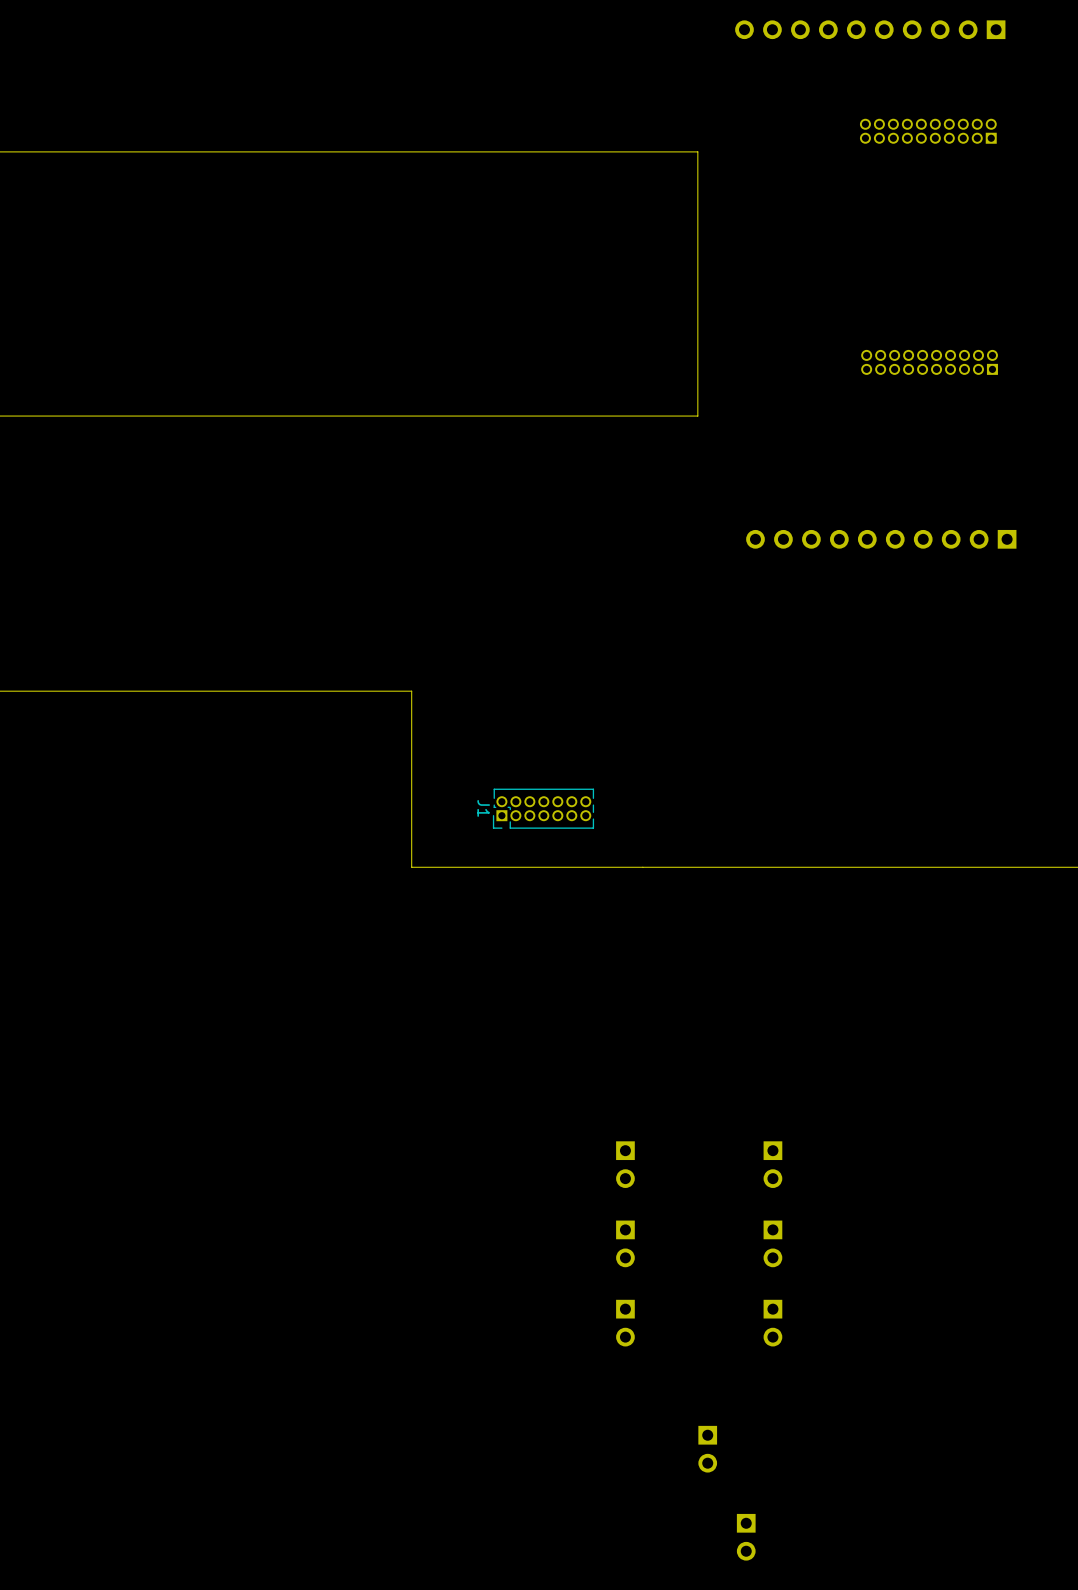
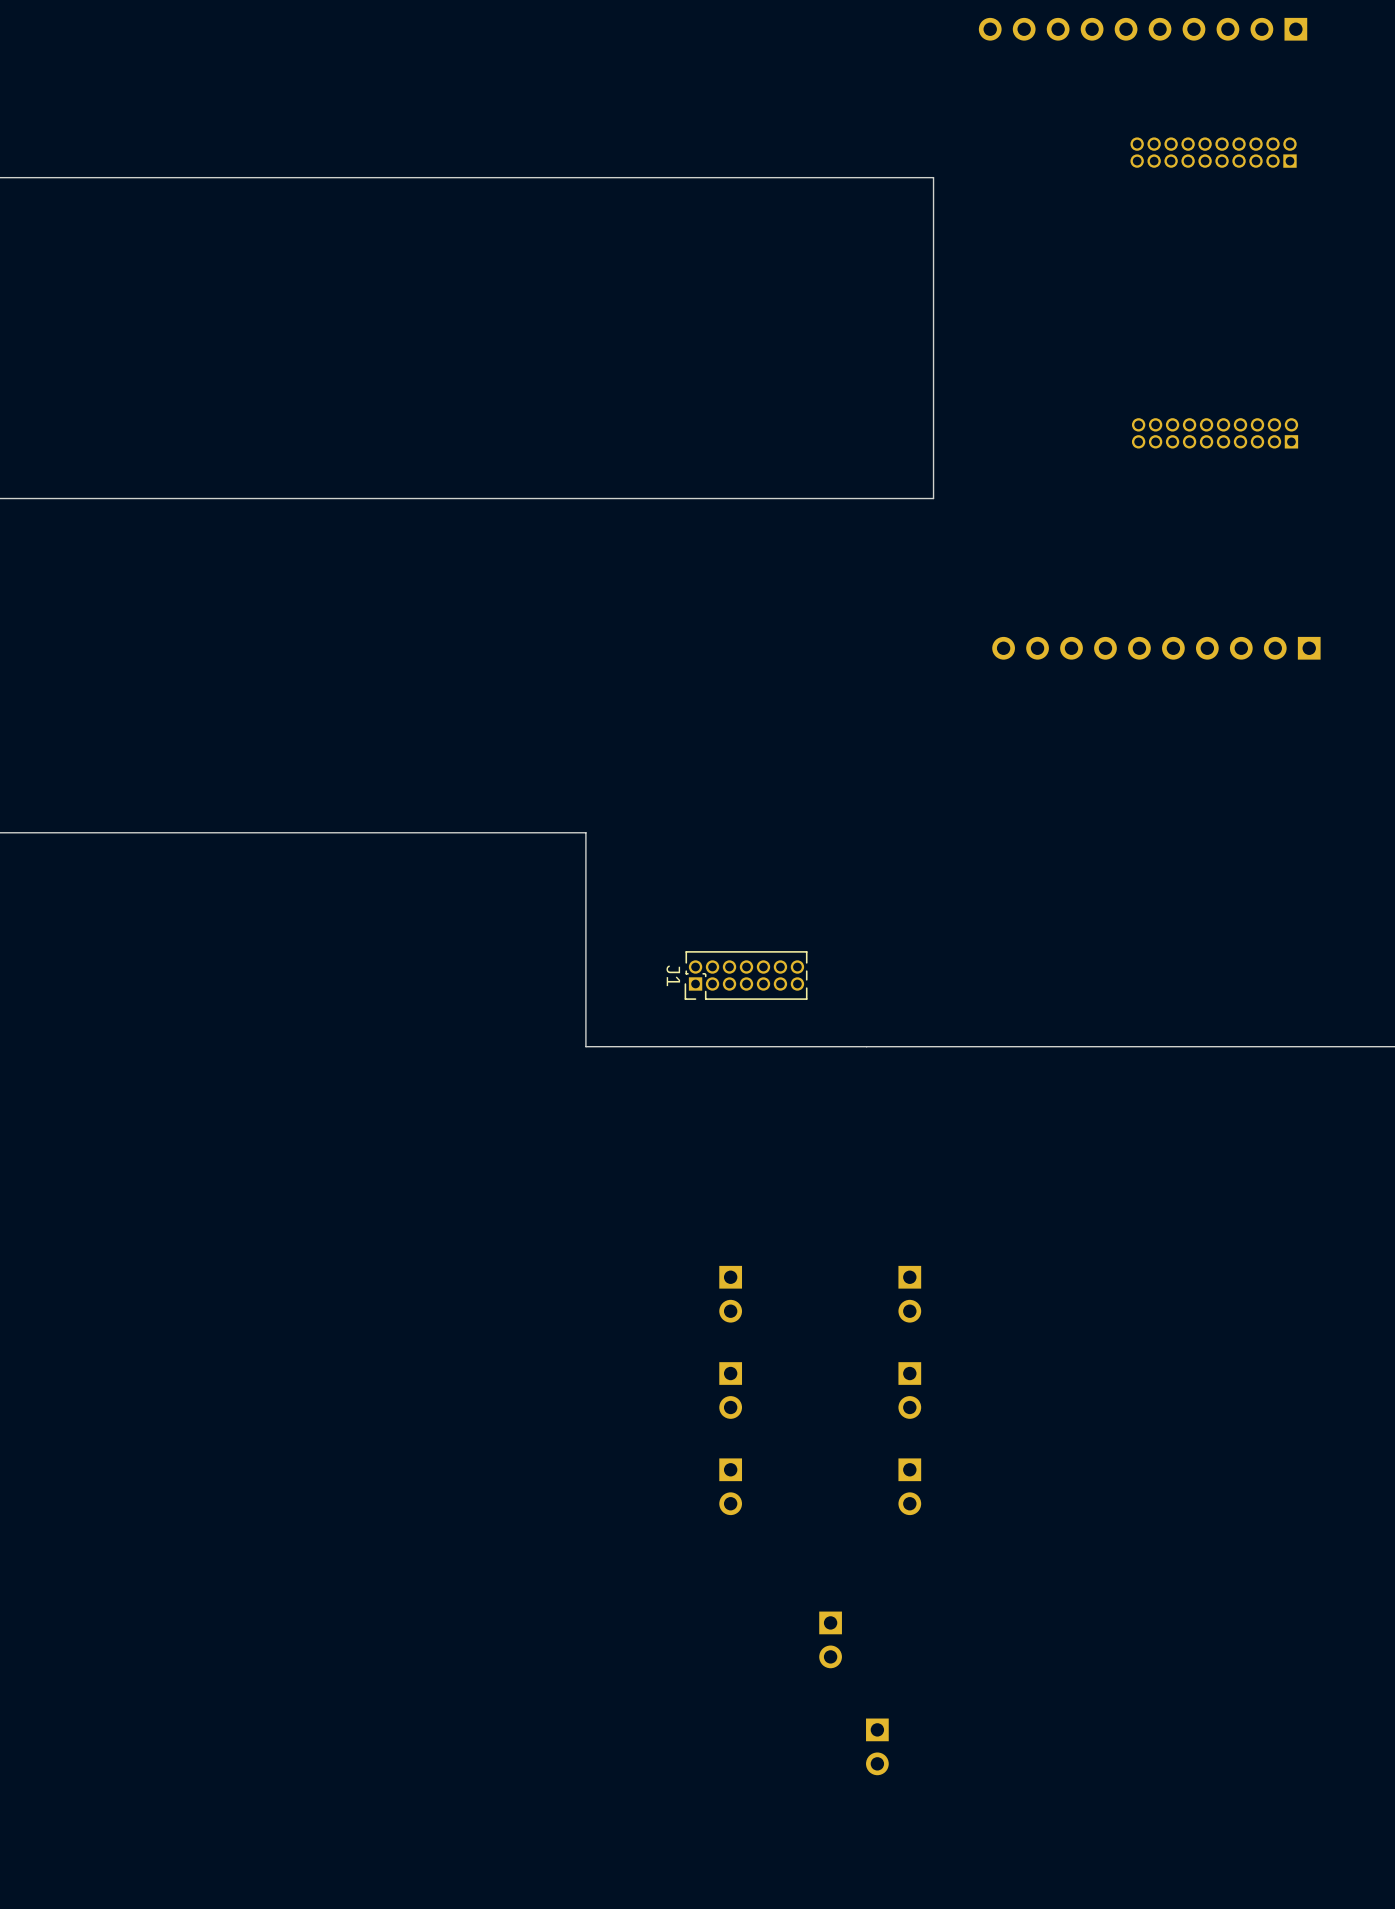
part: none -> (730, 1294)
part: none -> (909, 1294)
part: none -> (730, 1390)
part: none -> (909, 1390)
part: (625, 1164) -> none
part: (772, 1164) -> none
part: none -> (730, 1486)
part: none -> (909, 1486)
part: (625, 1243) -> none
part: (772, 1243) -> none
part position: (625, 1323) -> (830, 1639)
part: (772, 1323) -> none
part position: (707, 1449) -> (877, 1746)
part: (746, 1537) -> none

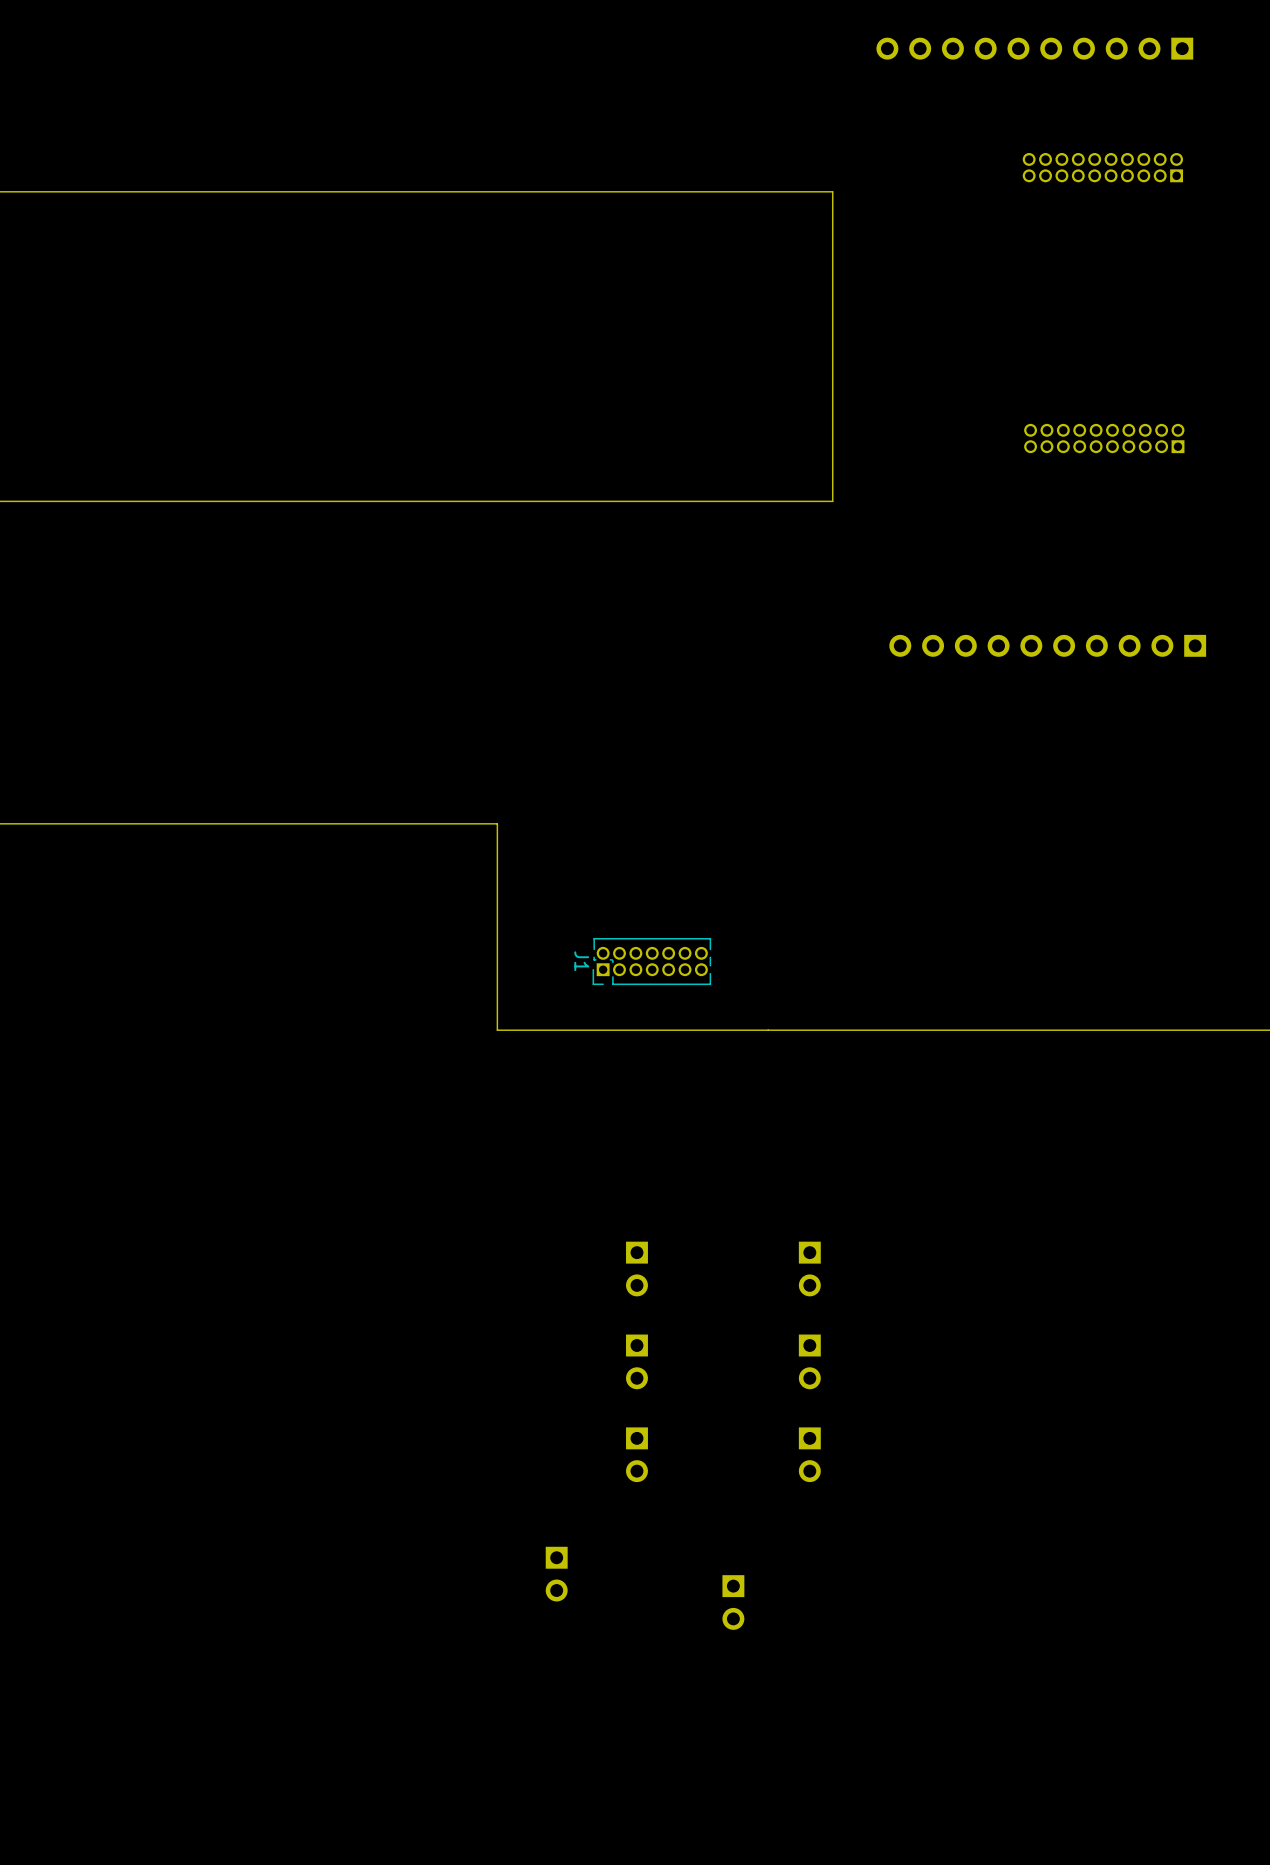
part position: (877, 1746) -> (556, 1574)

